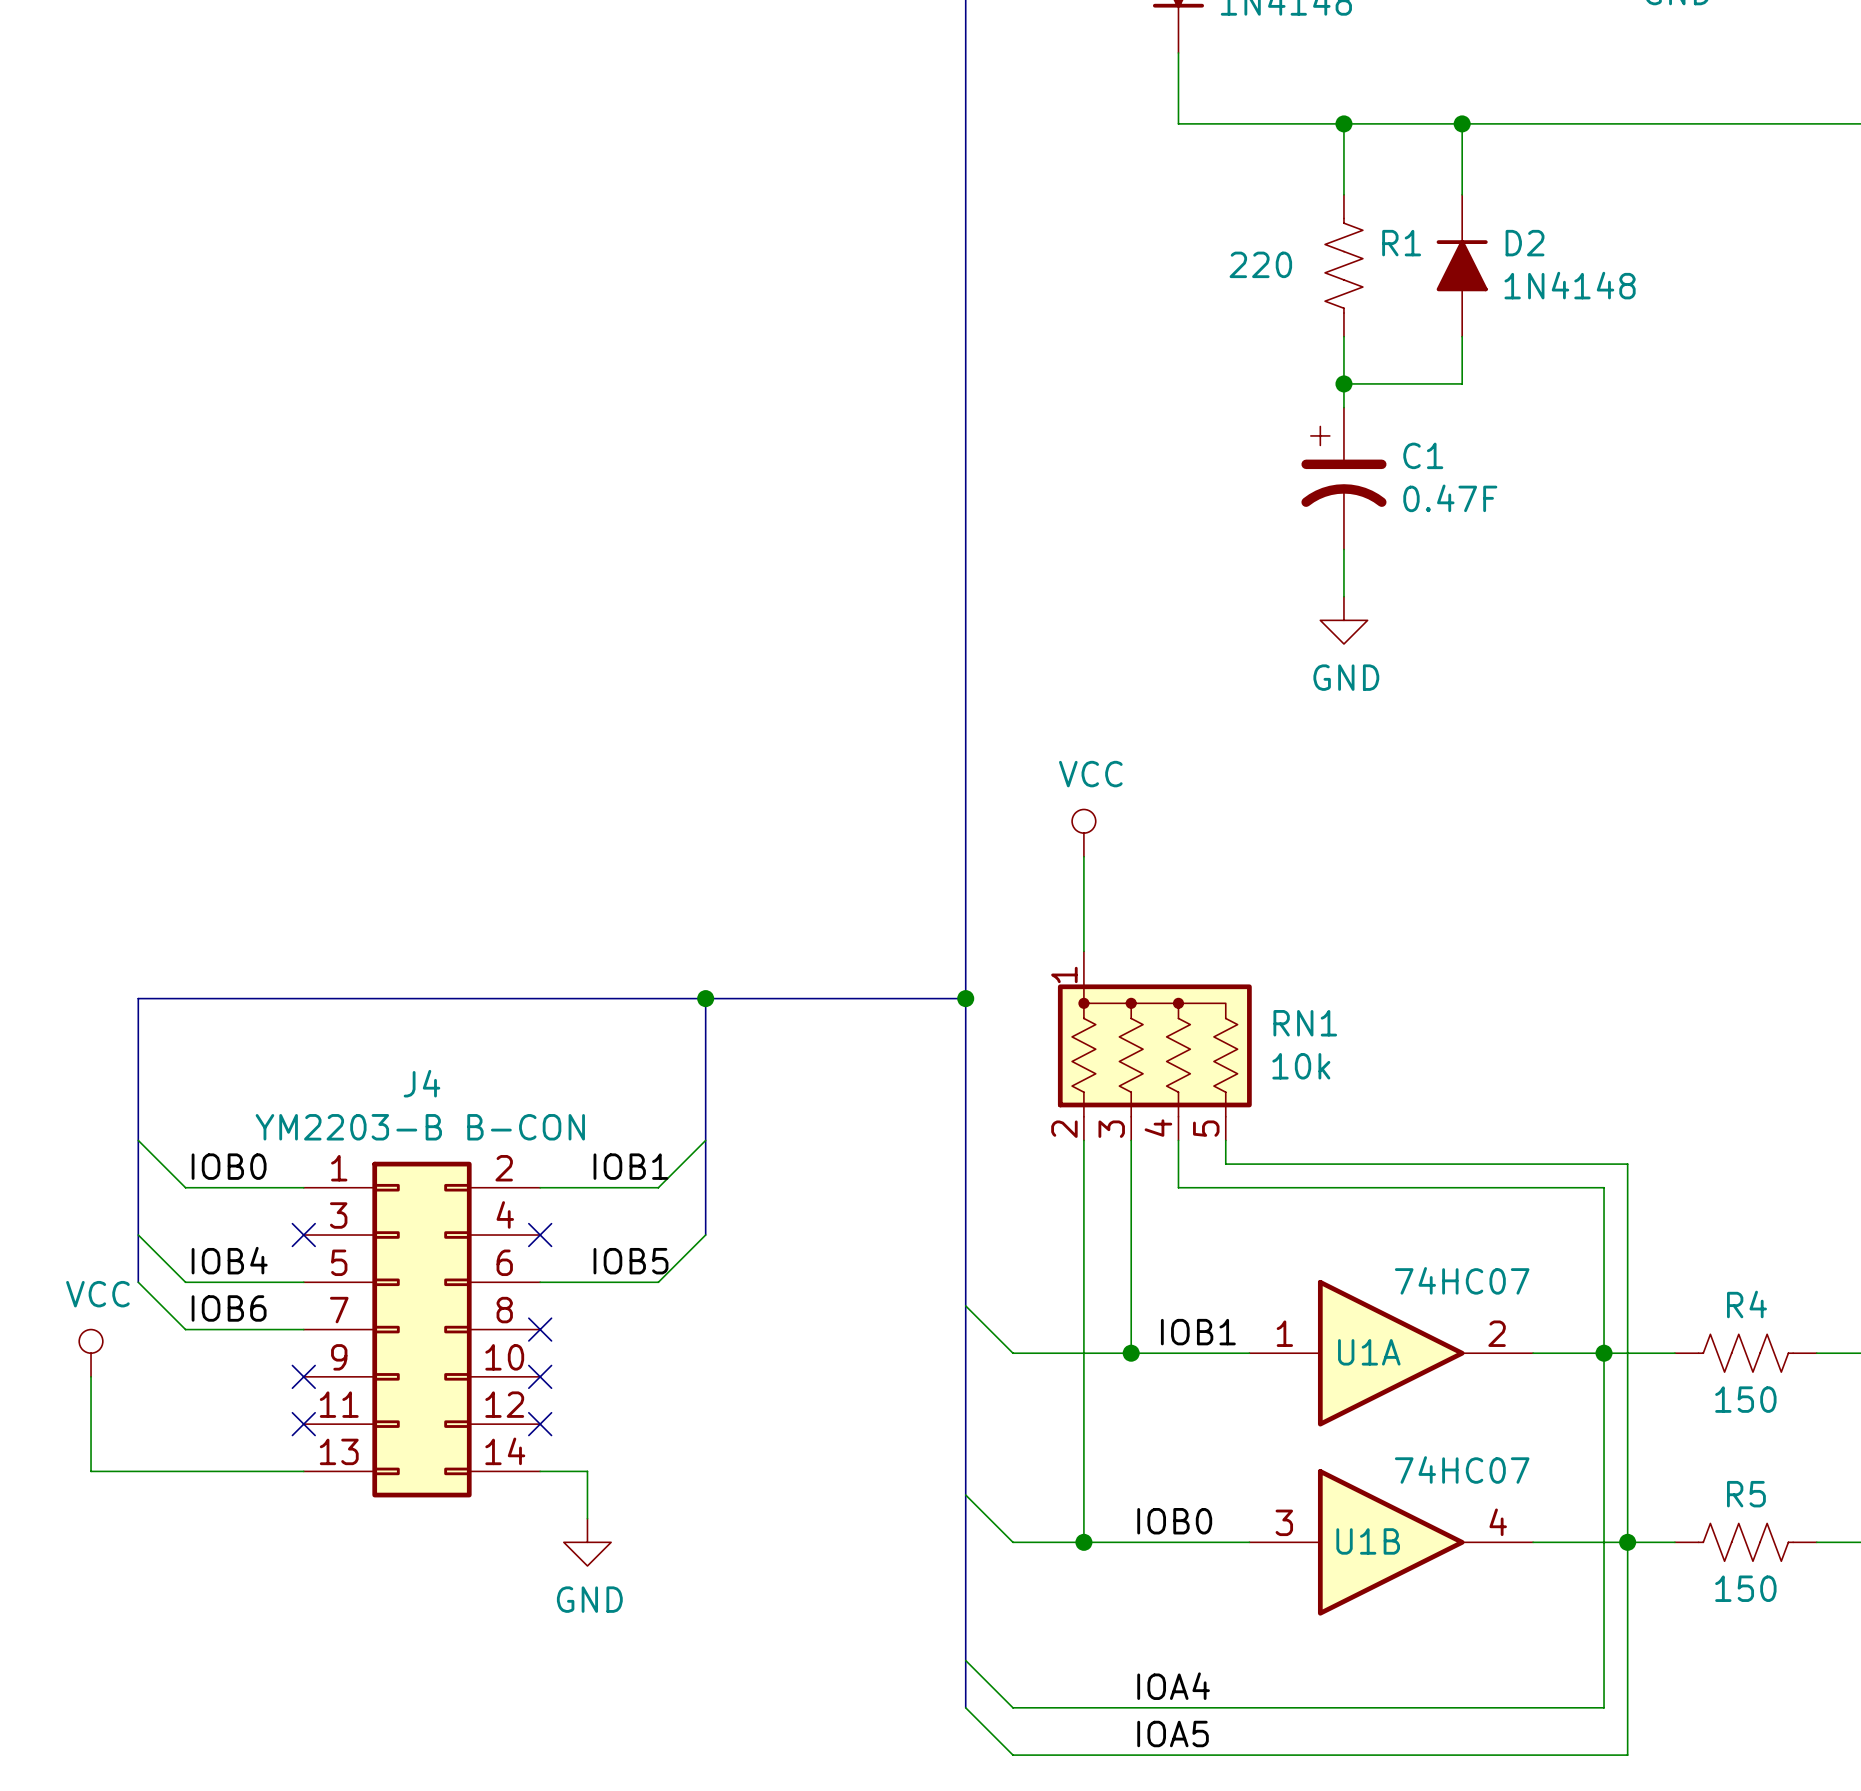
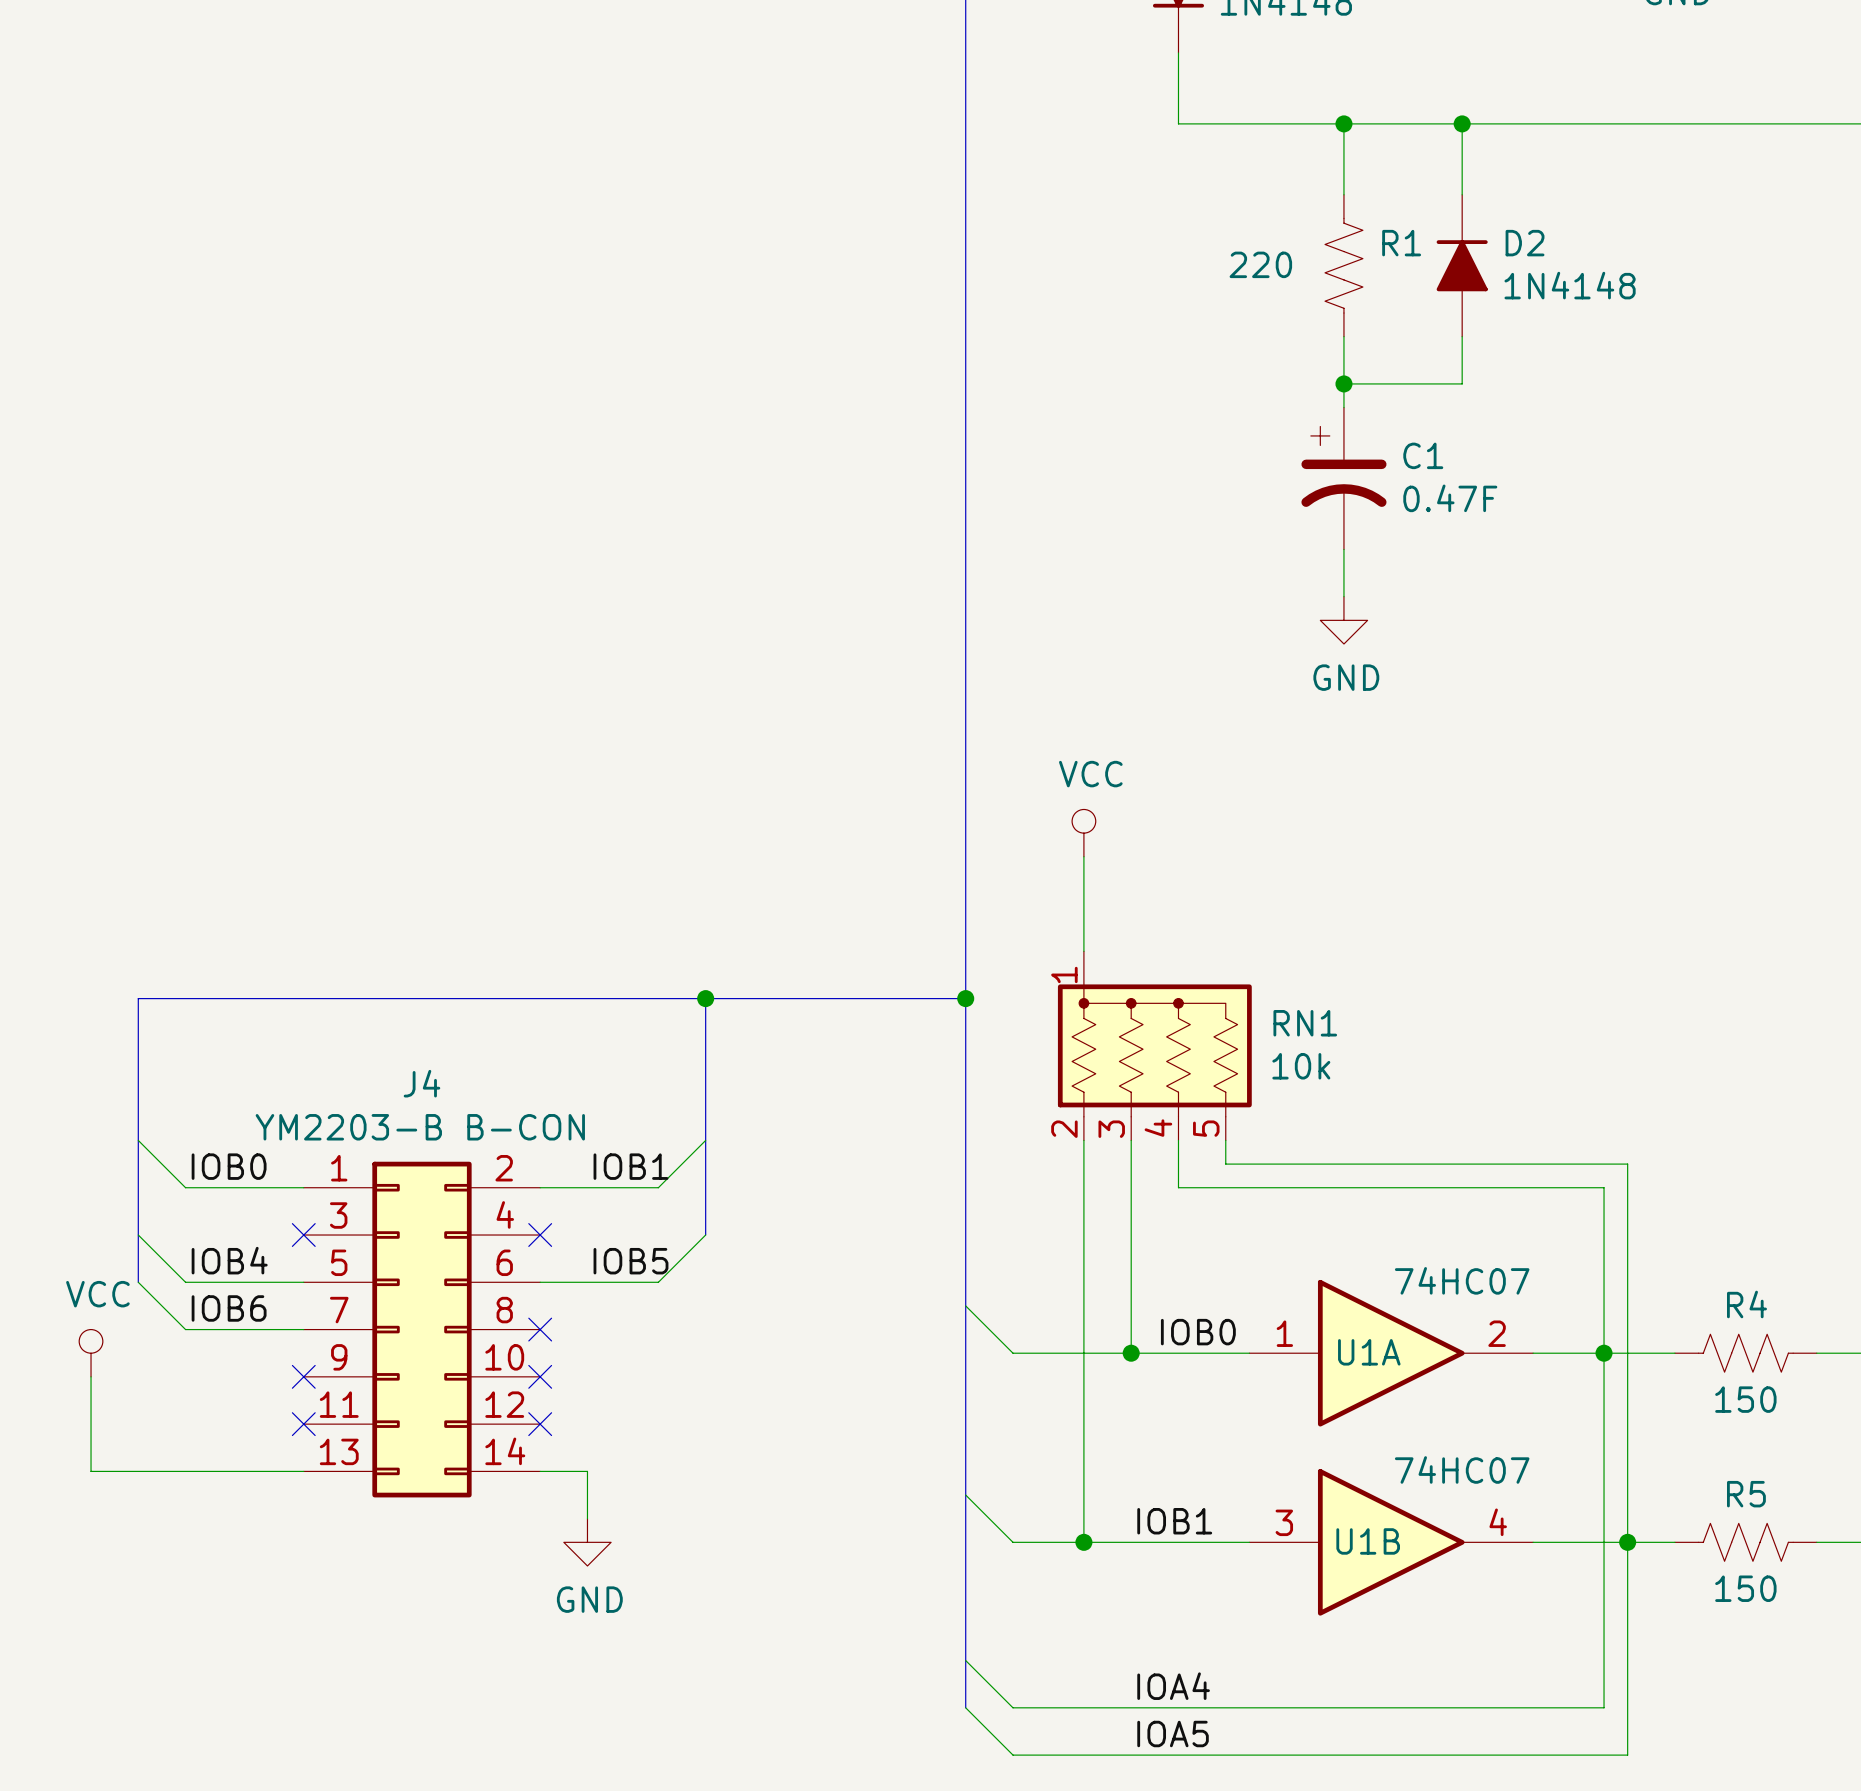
label: IOB1 (1198, 1332) -> IOB0 (1198, 1332)
label: IOB0 (1174, 1521) -> IOB1 (1174, 1521)

